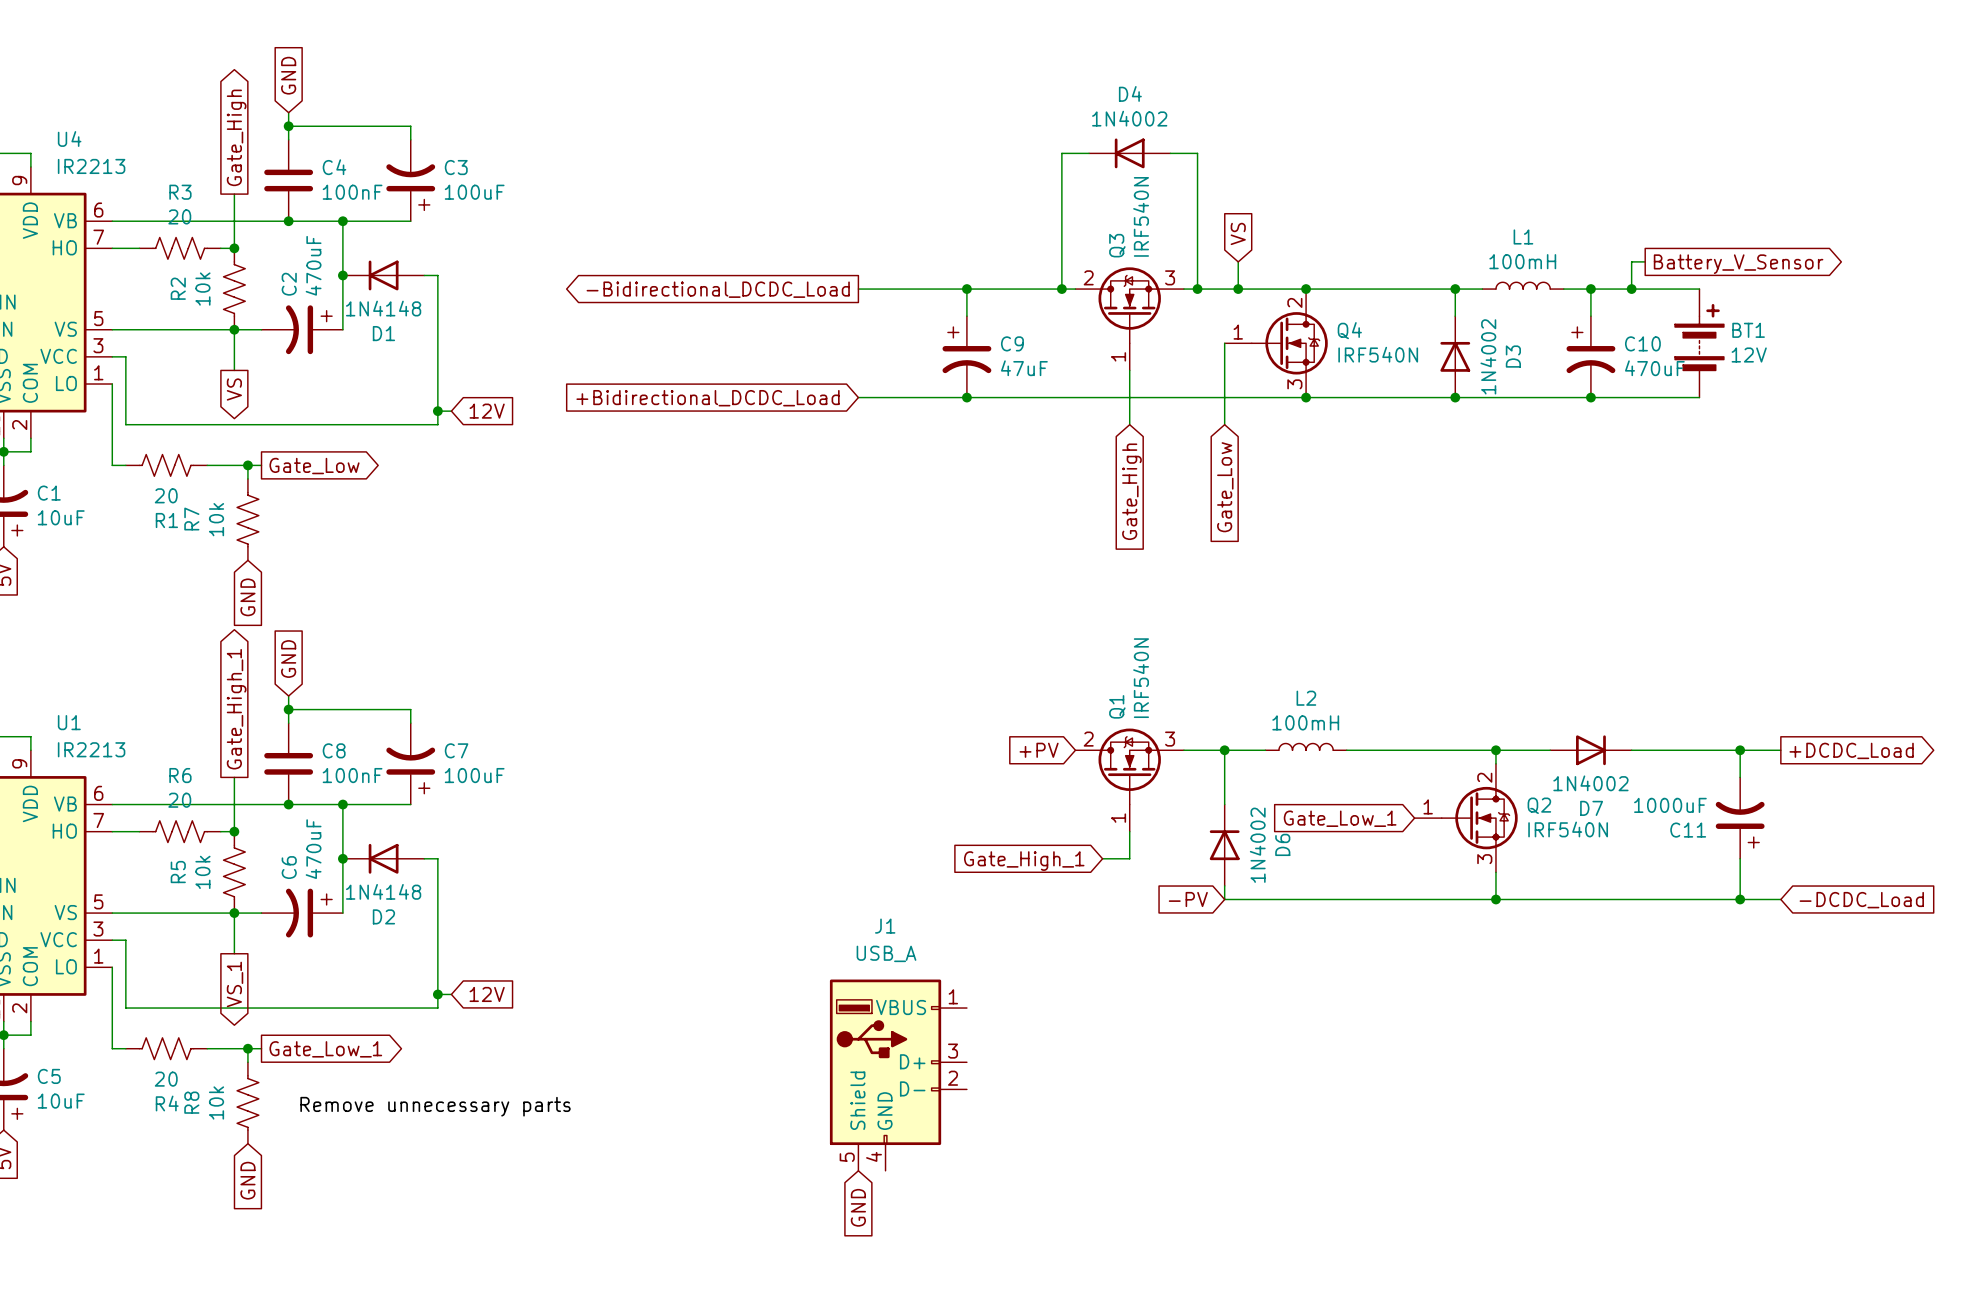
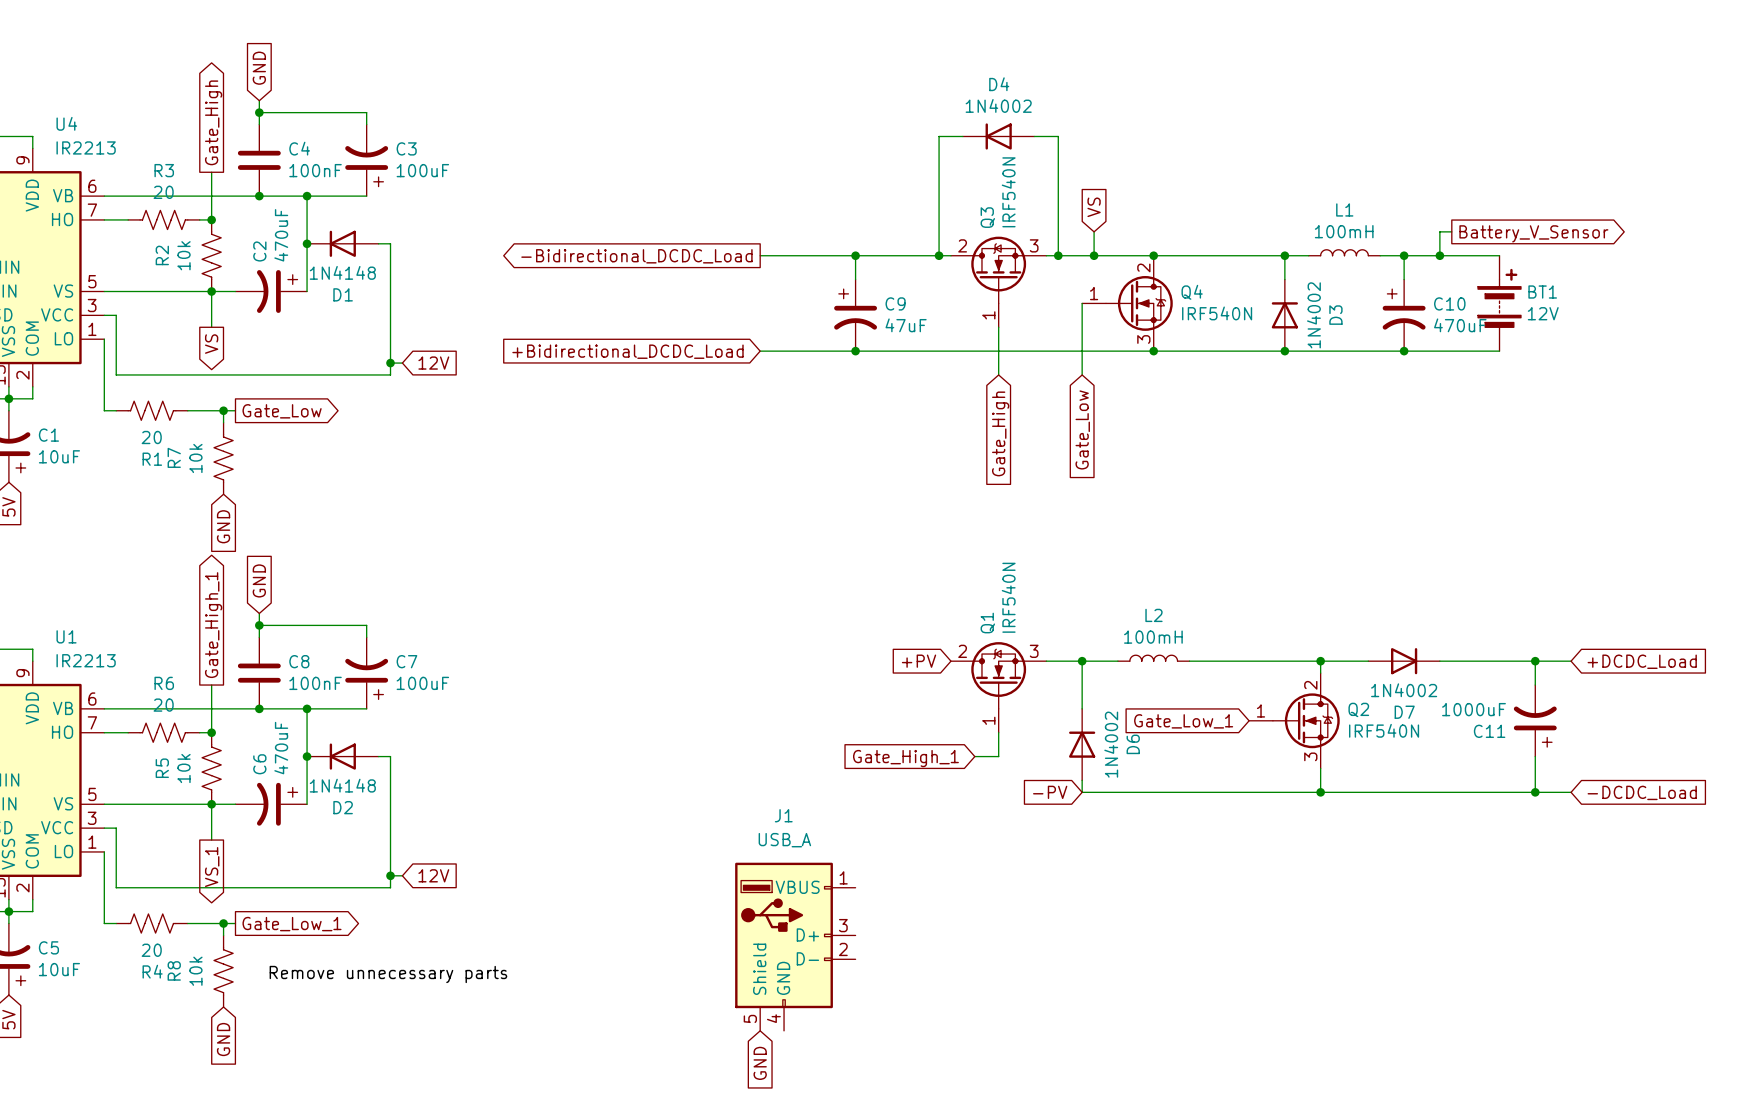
global label shape: output (1851, 750) -> input (1642, 661)

